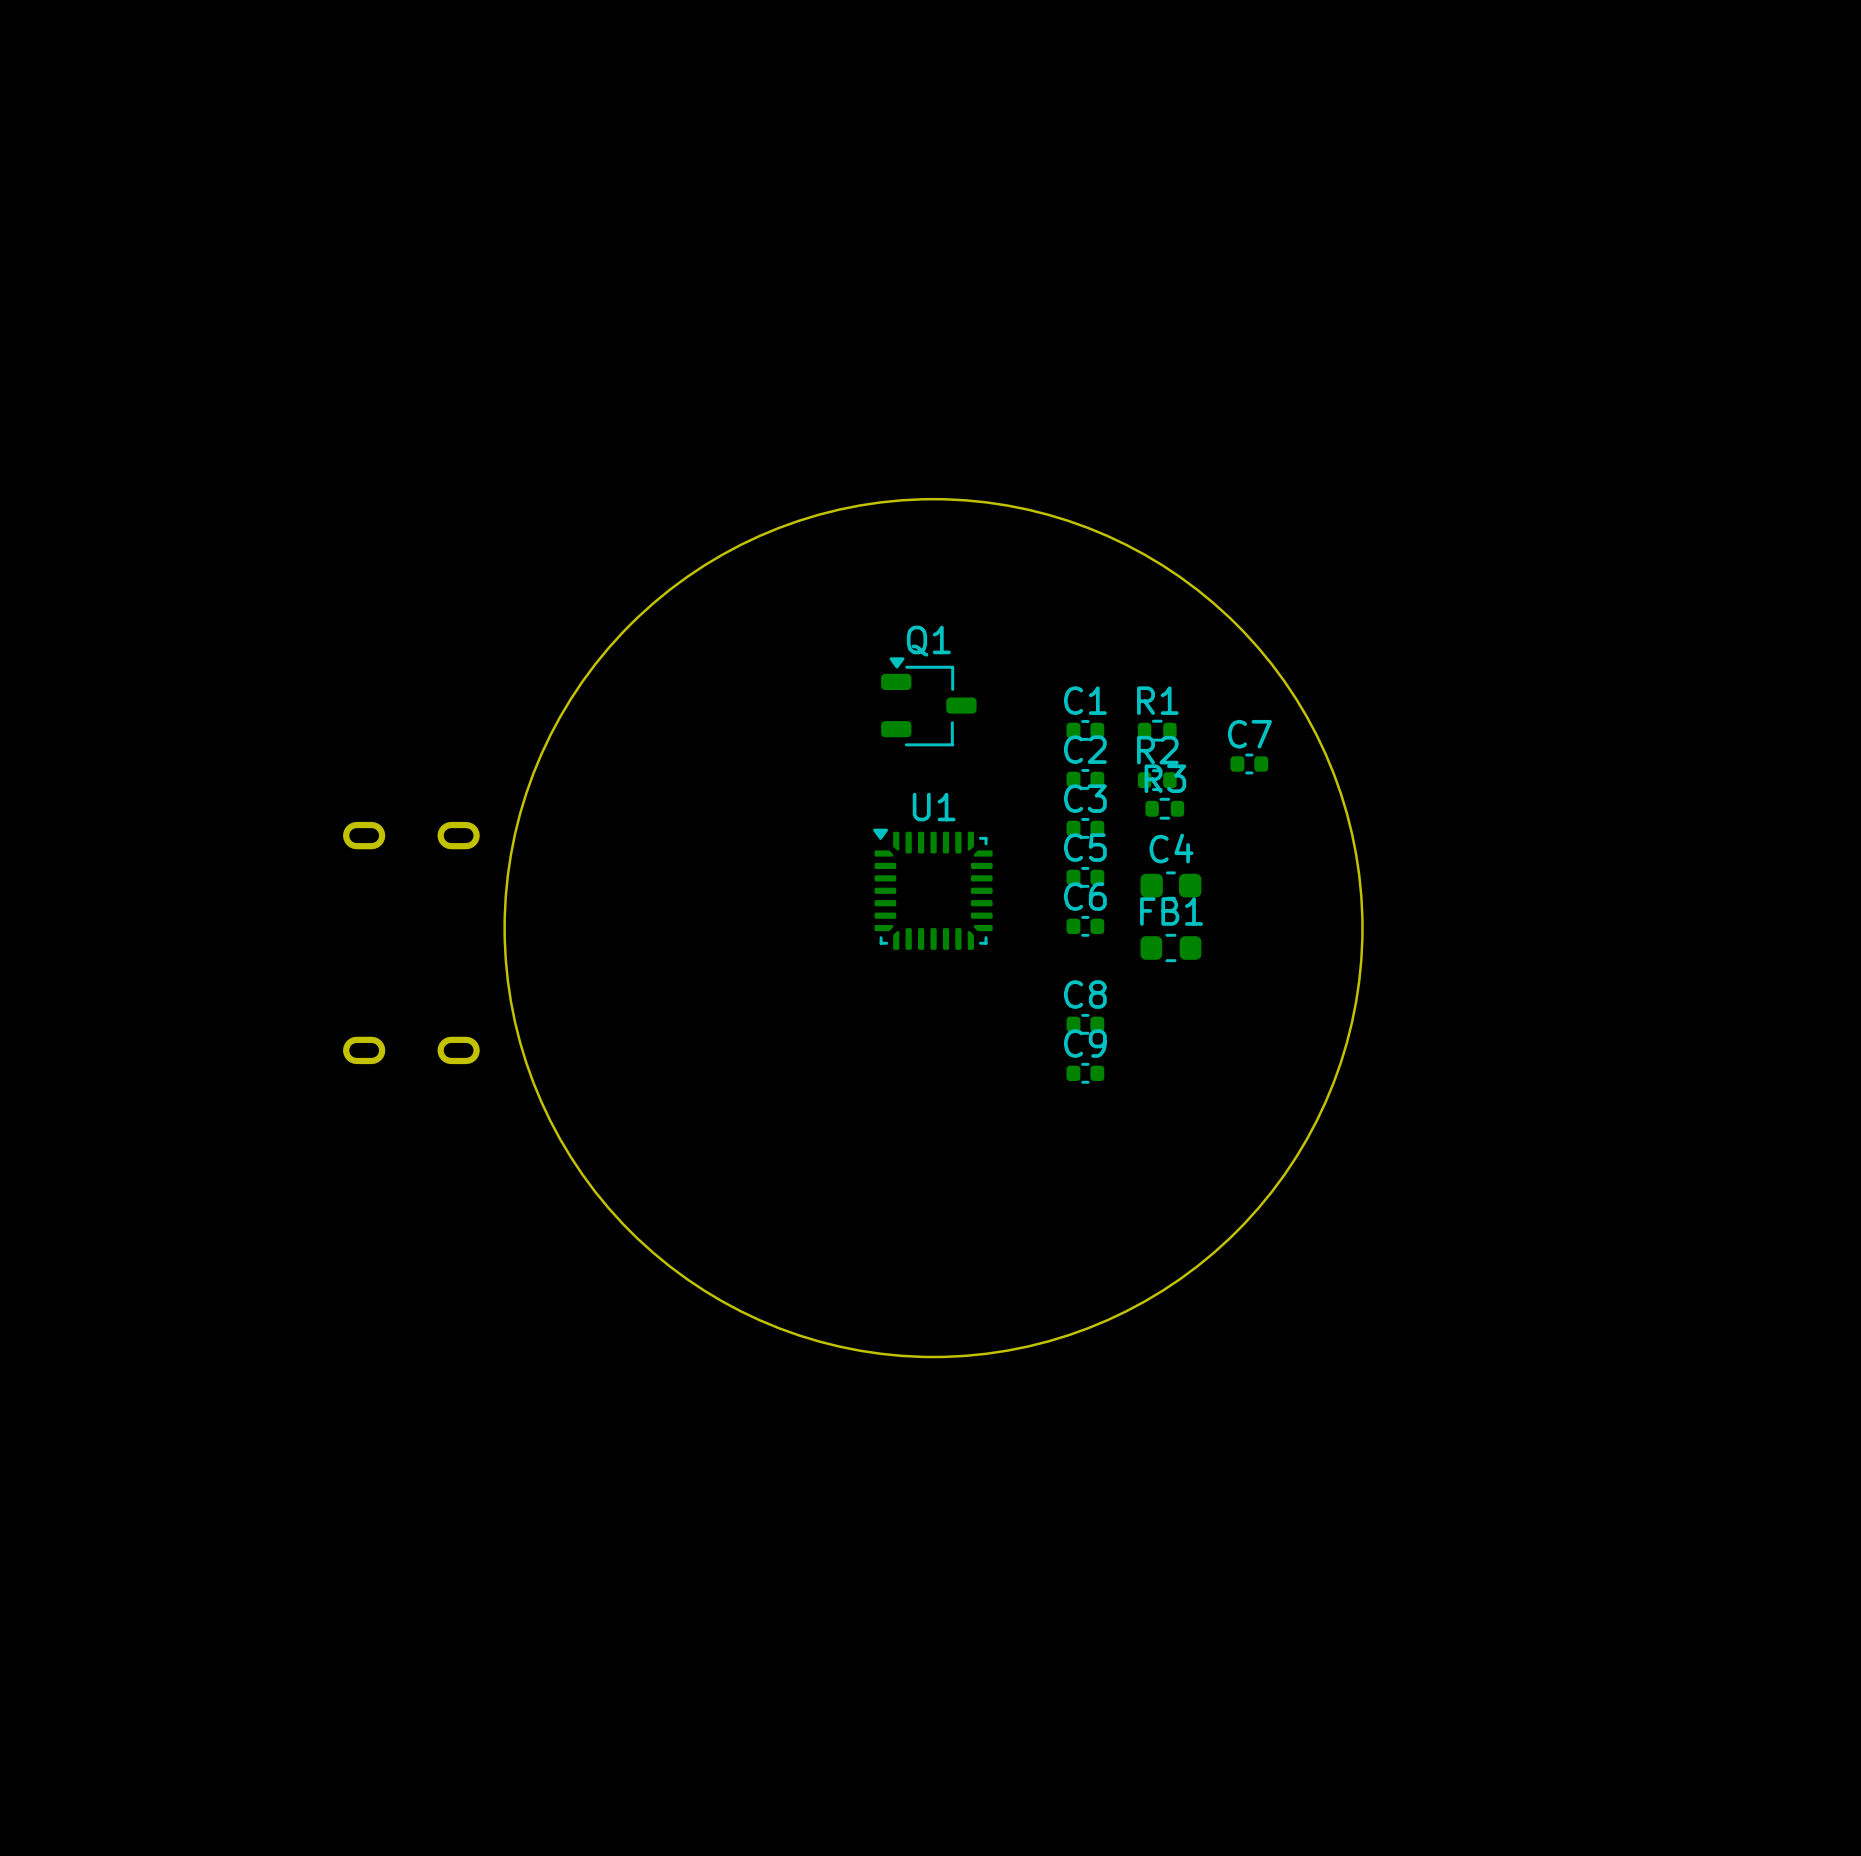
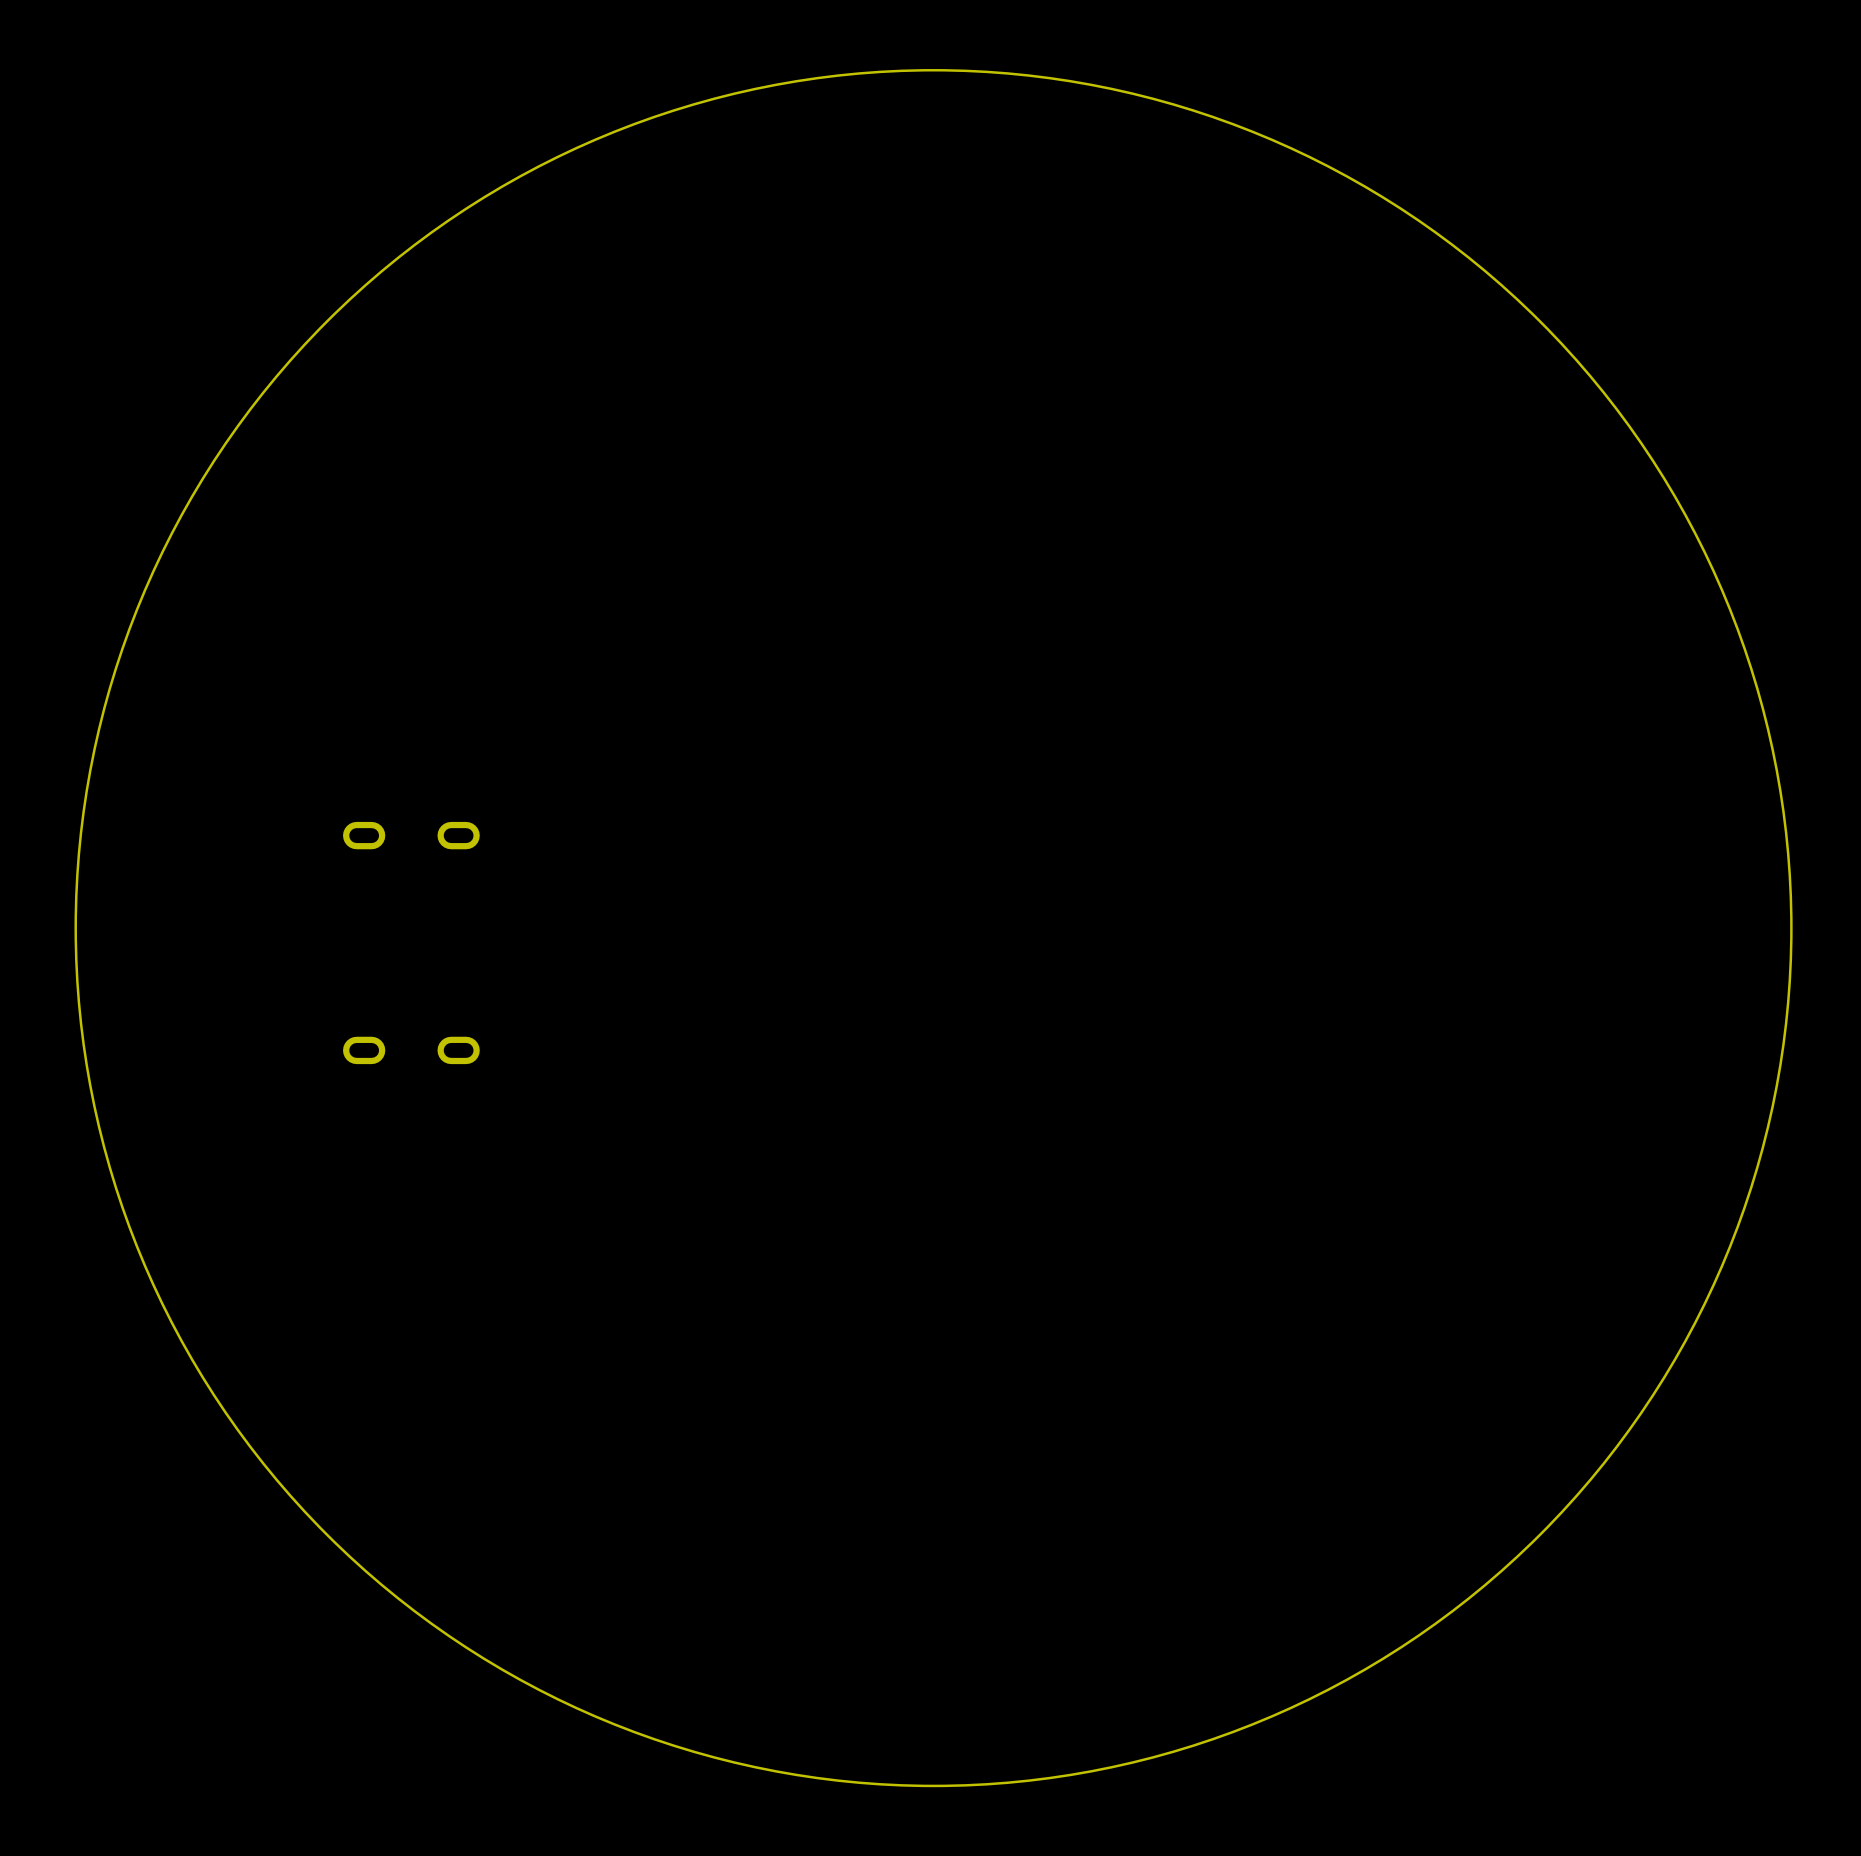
round board edge size: [503, 497, 1364, 1359] -> [74, 69, 1793, 1788]
Q1: (928, 701) -> none
C1: (1085, 730) -> none
R1: (1157, 730) -> none
C7: (1249, 763) -> none
C2: (1085, 779) -> none
R2: (1157, 780) -> none
R3: (1164, 808) -> none
C3: (1085, 828) -> none
C5: (1085, 877) -> none
C4: (1170, 885) -> none
U1: (932, 889) -> none
C6: (1085, 926) -> none
FB1: (1170, 947) -> none
C8: (1085, 1024) -> none
C9: (1085, 1073) -> none

